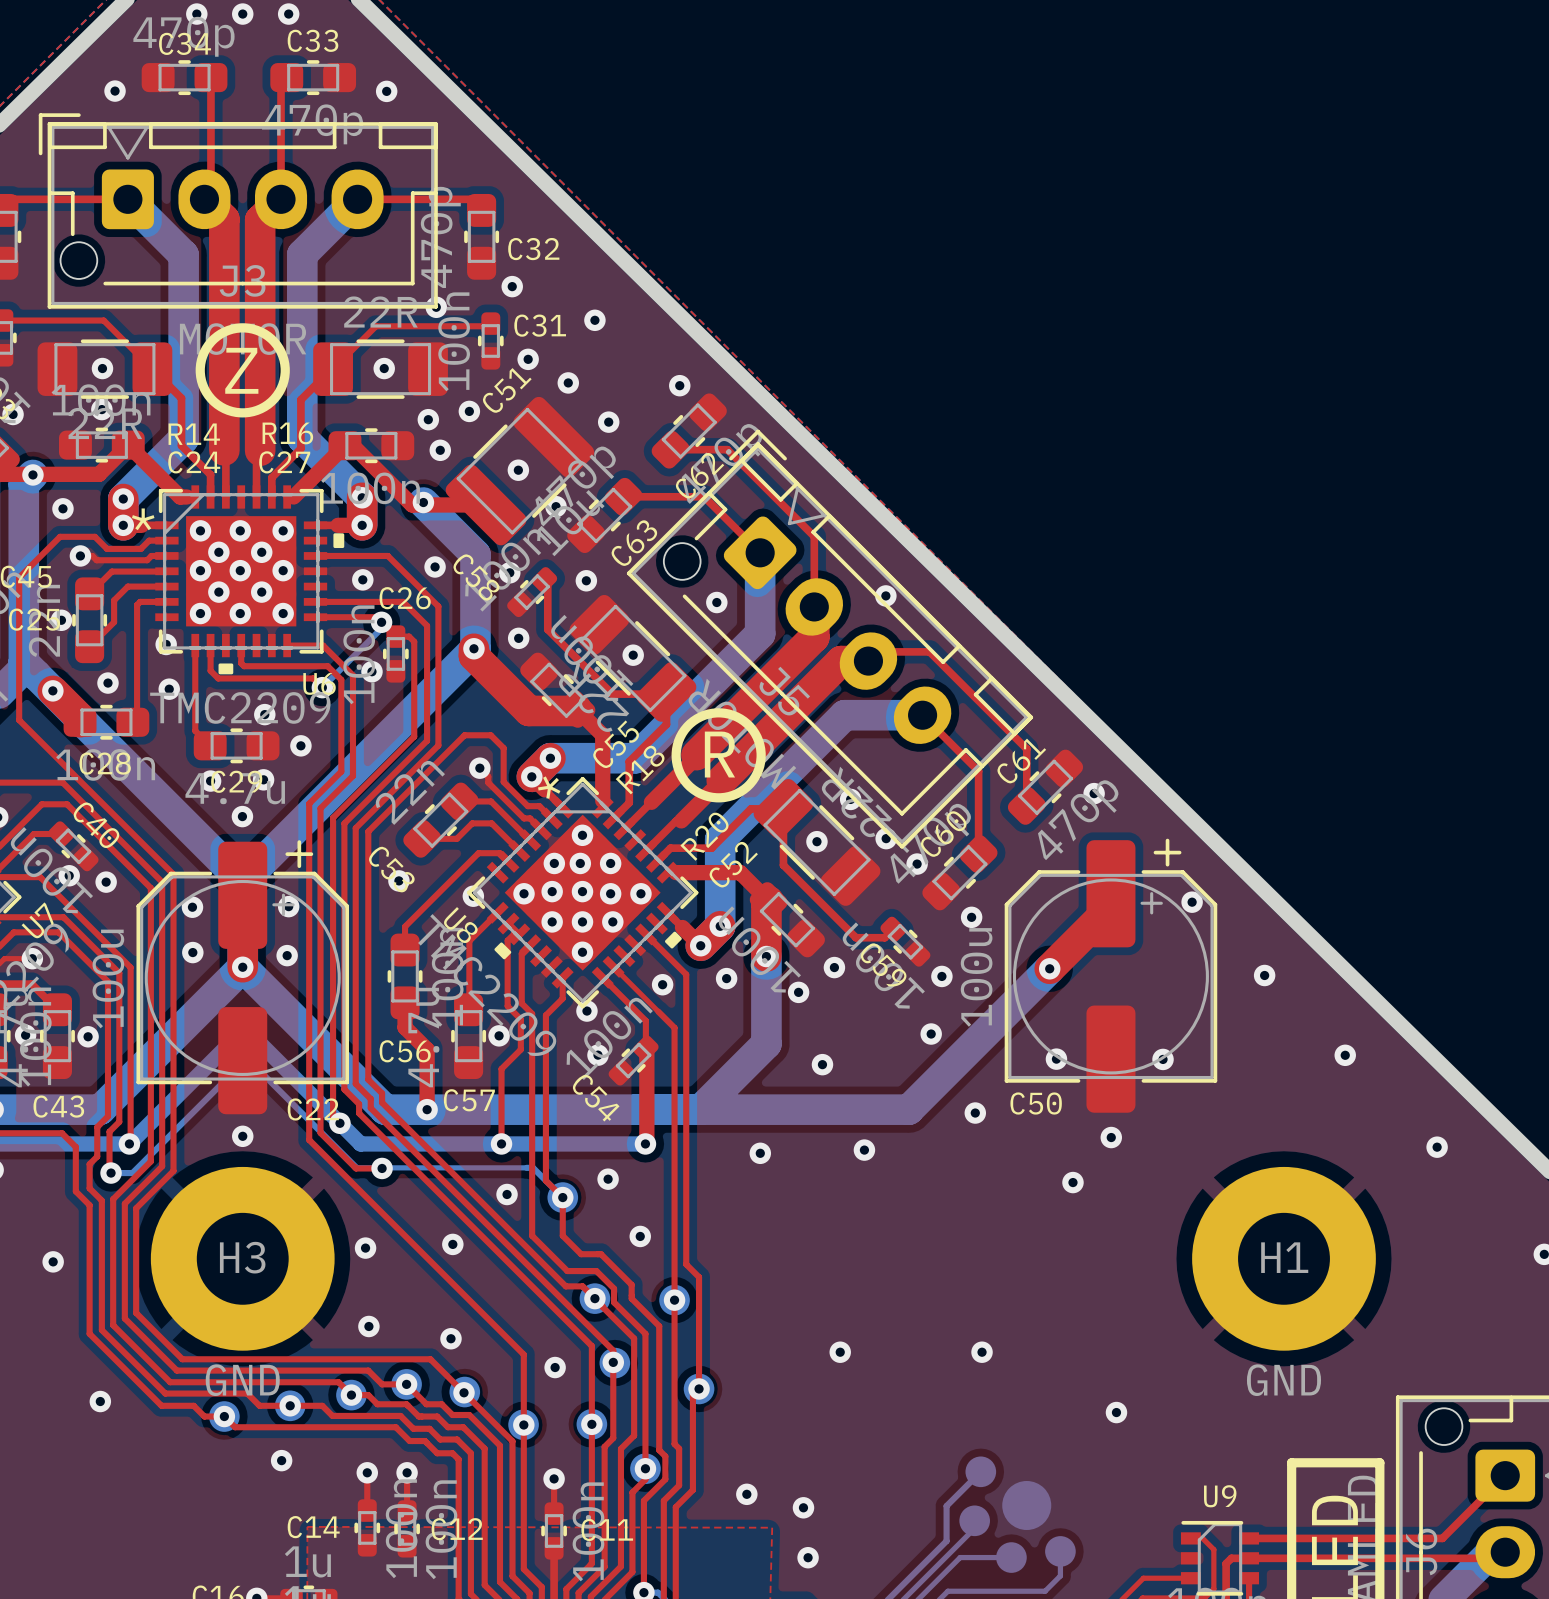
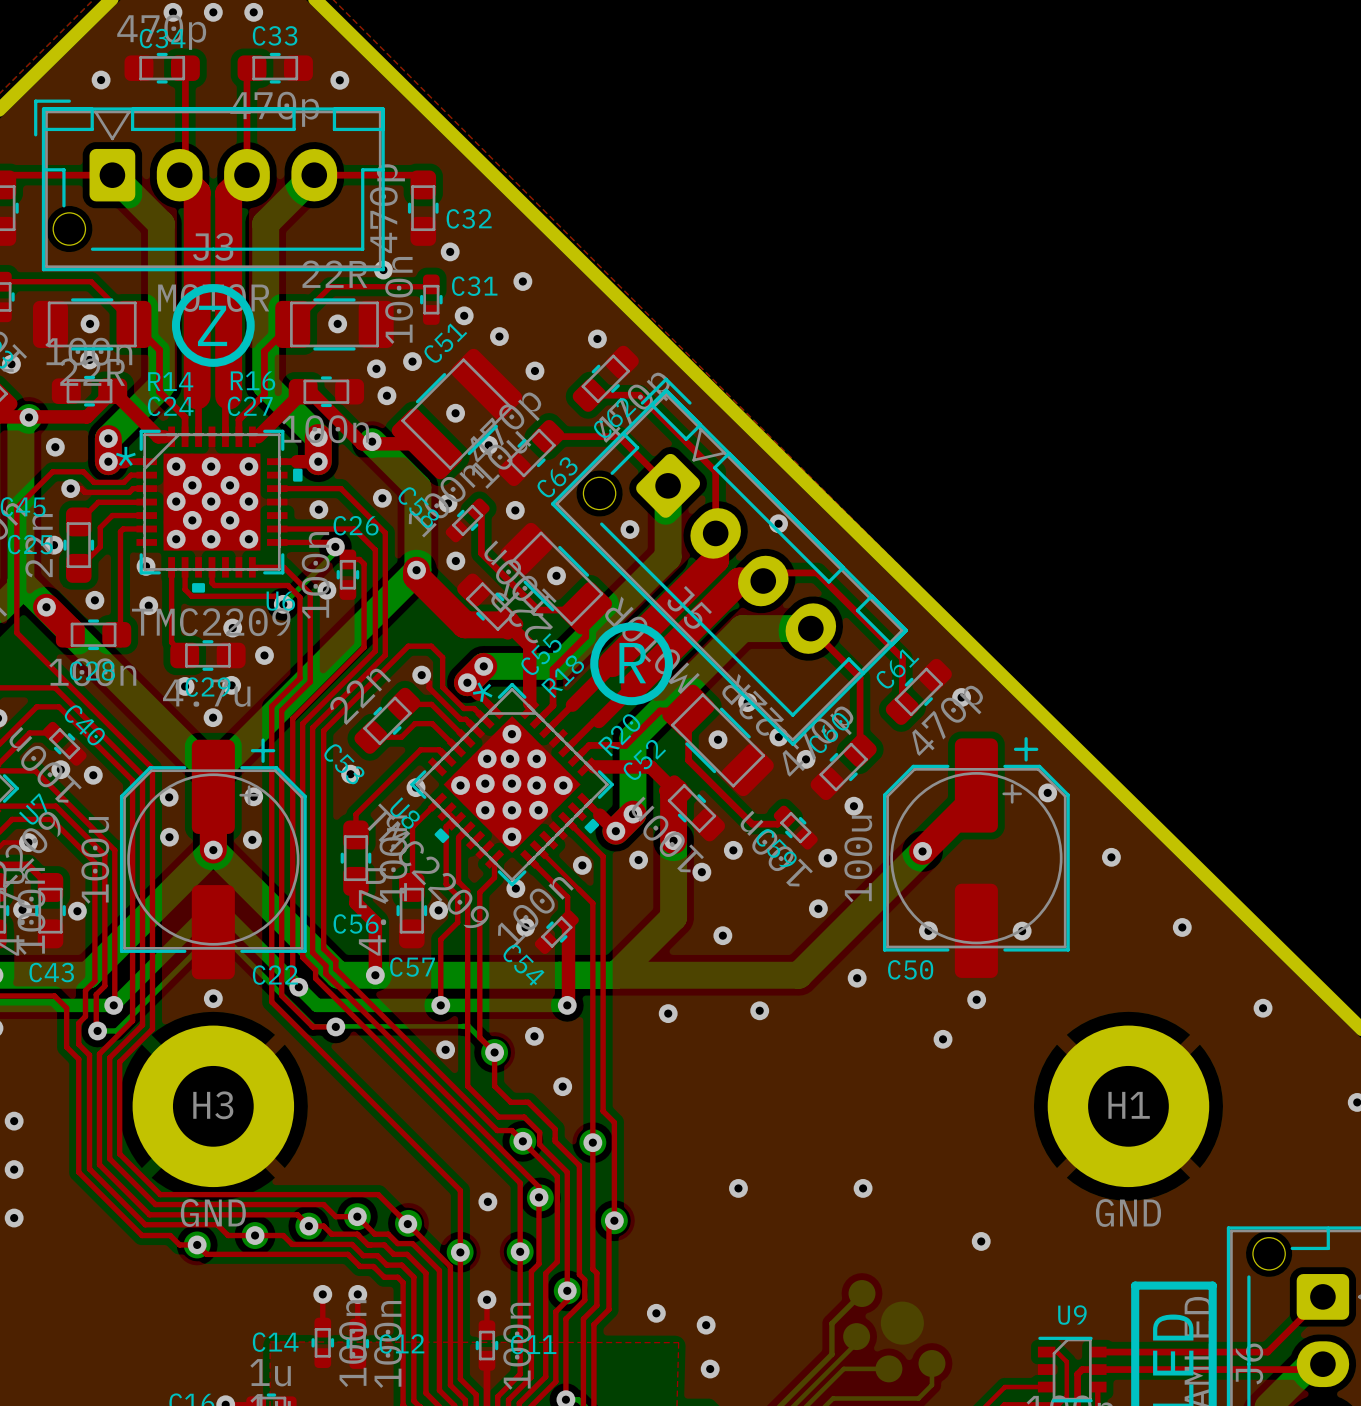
via: (452, 1244) -> none
via: (365, 1248) -> none
via: (53, 1261) -> none
via: none -> (14, 1121)
via: (368, 1326) -> none
via: none -> (14, 1169)
via: (450, 1338) -> none
via: none -> (14, 1218)
via: (100, 1401) -> none
via: (281, 1460) -> none

